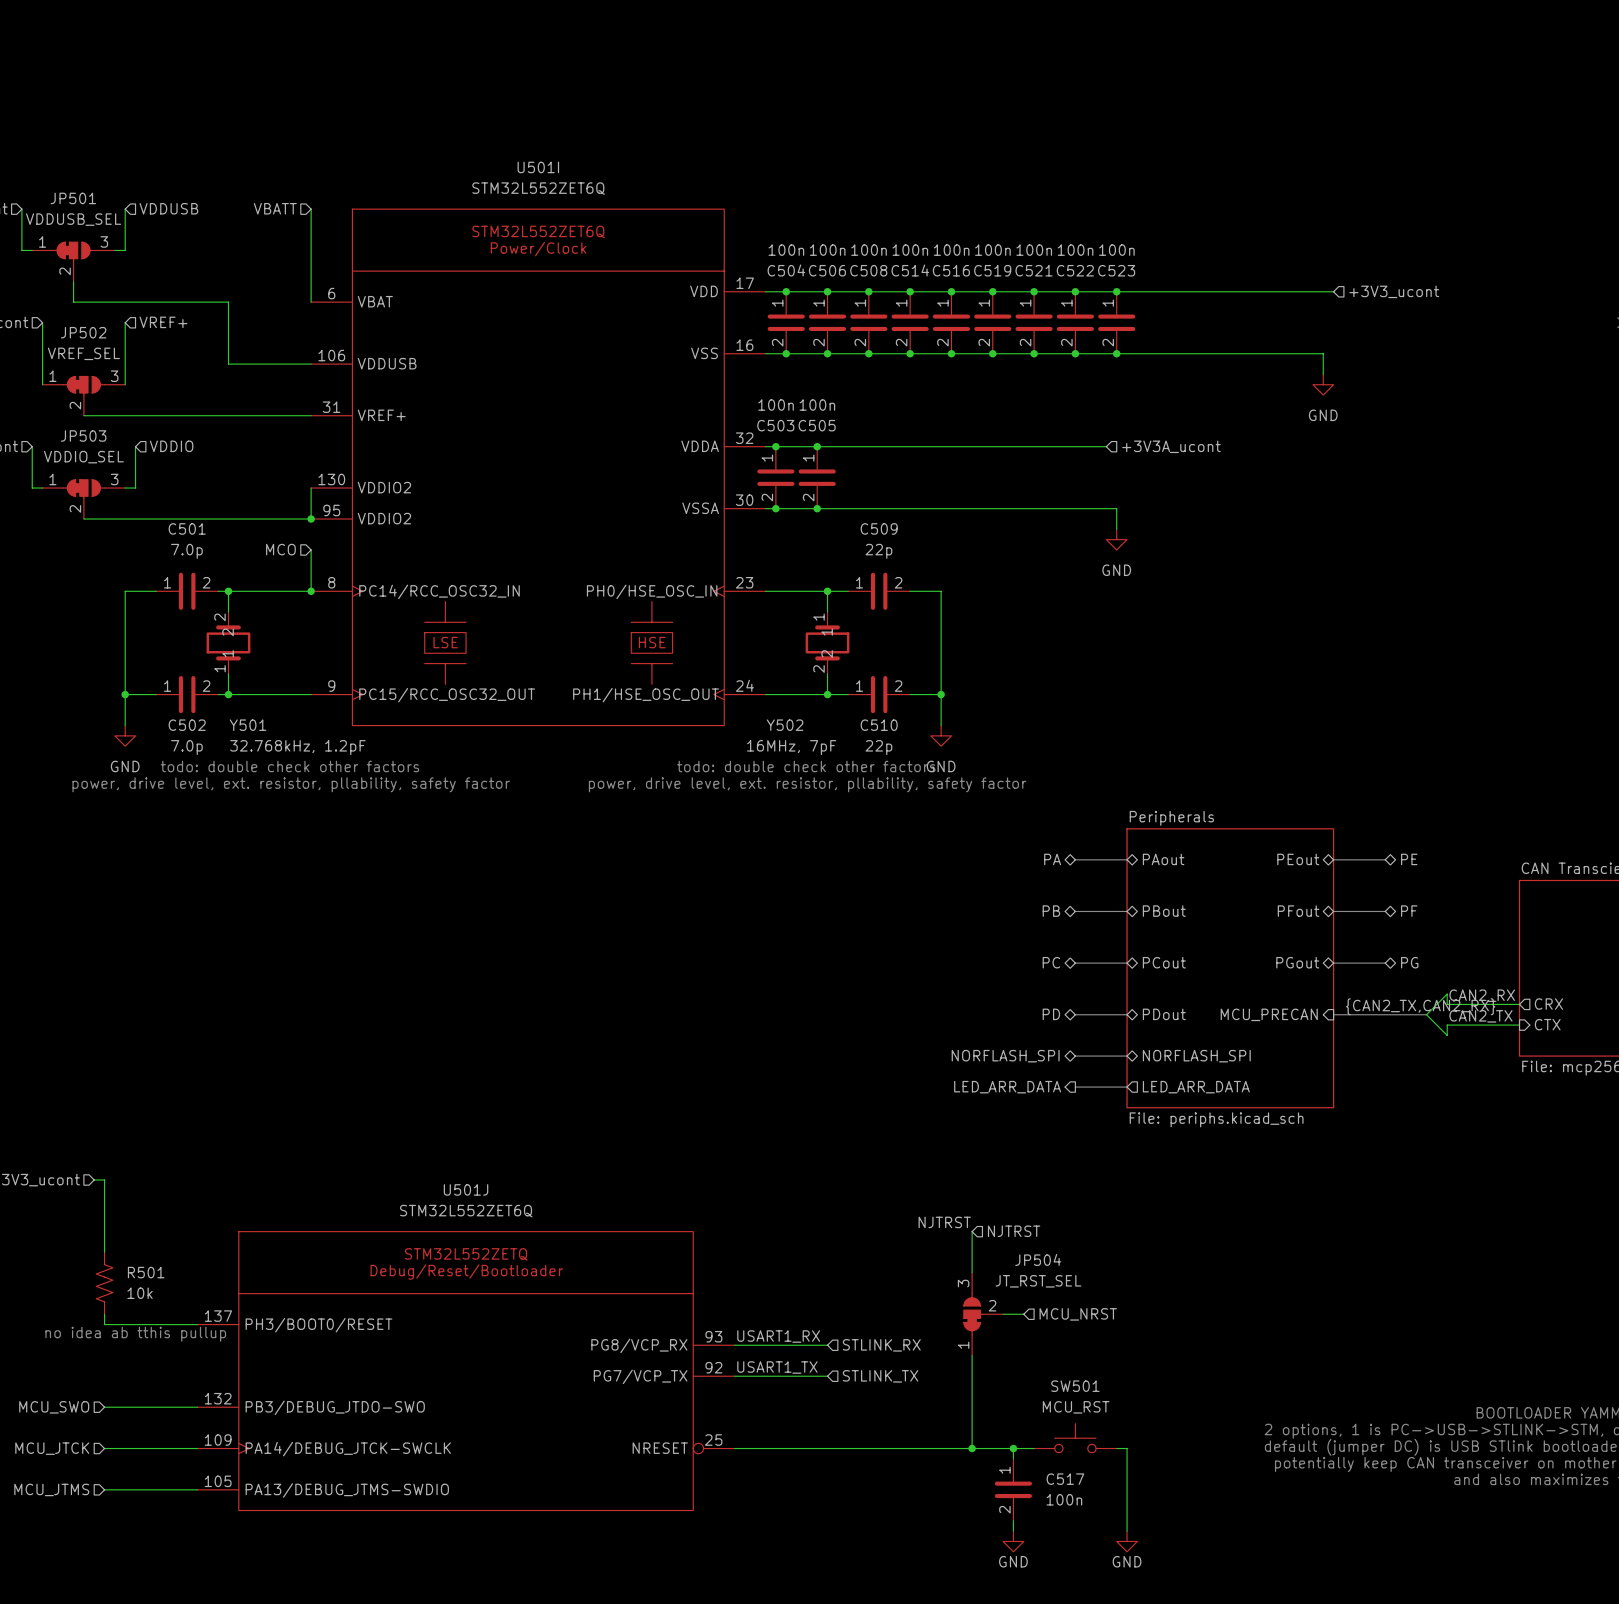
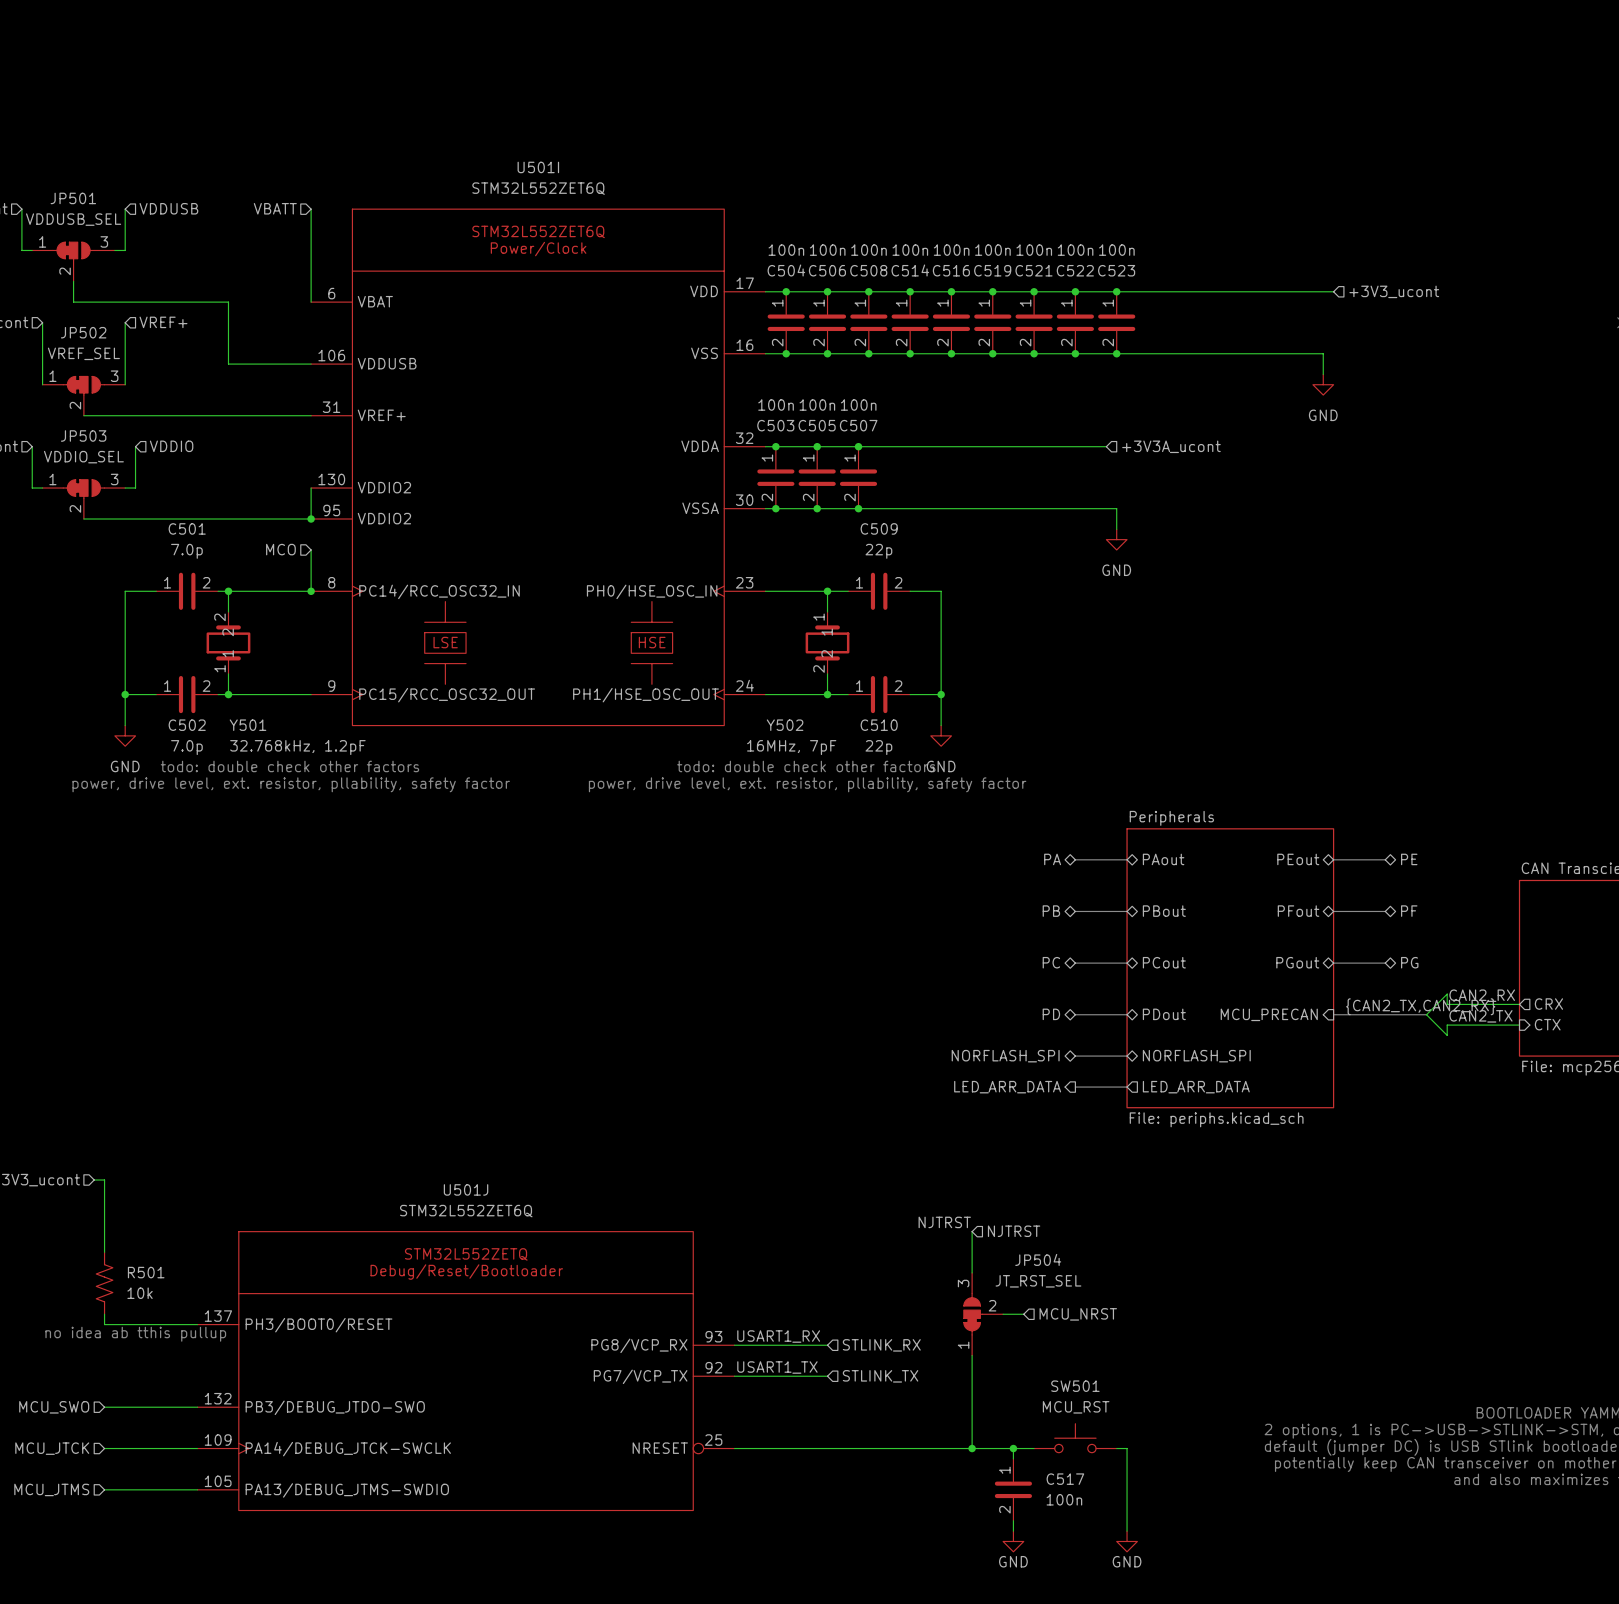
junction: none -> (858, 446)
C507: none -> 100n (858, 477)
junction: none -> (858, 508)

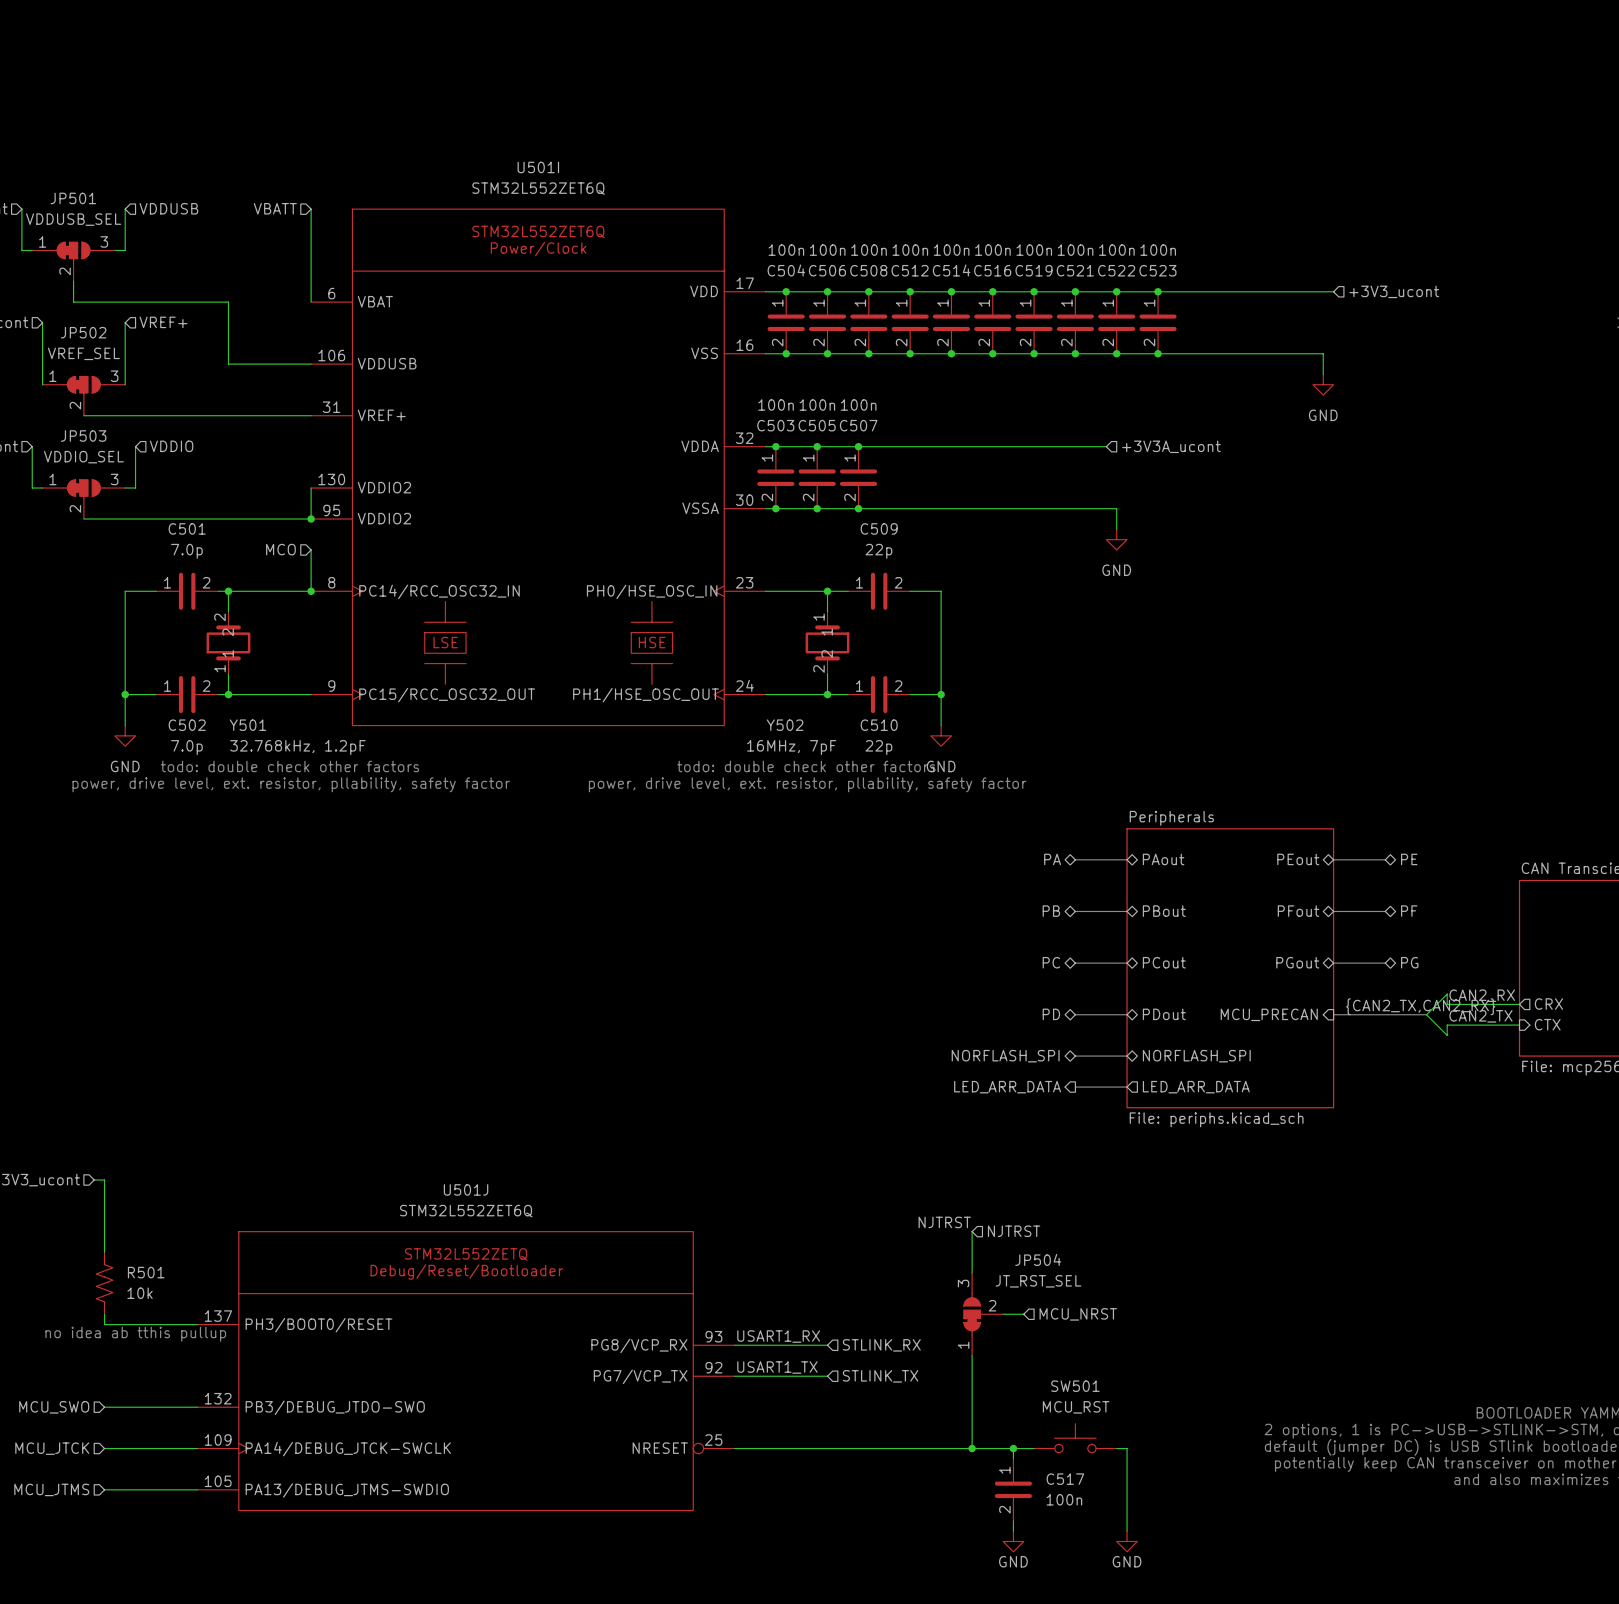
C514 name: C514 (910, 270) -> C512 (910, 270)
C516 name: C516 (951, 270) -> C514 (951, 270)
C519 name: C519 (992, 270) -> C516 (992, 270)
C521 name: C521 (1034, 270) -> C519 (1034, 270)
C522 name: C522 (1075, 270) -> C521 (1075, 270)
C523 name: C523 (1116, 270) -> C522 (1116, 270)
junction: none -> (1158, 291)
C523: none -> 100n (1158, 322)
junction: none -> (1158, 353)

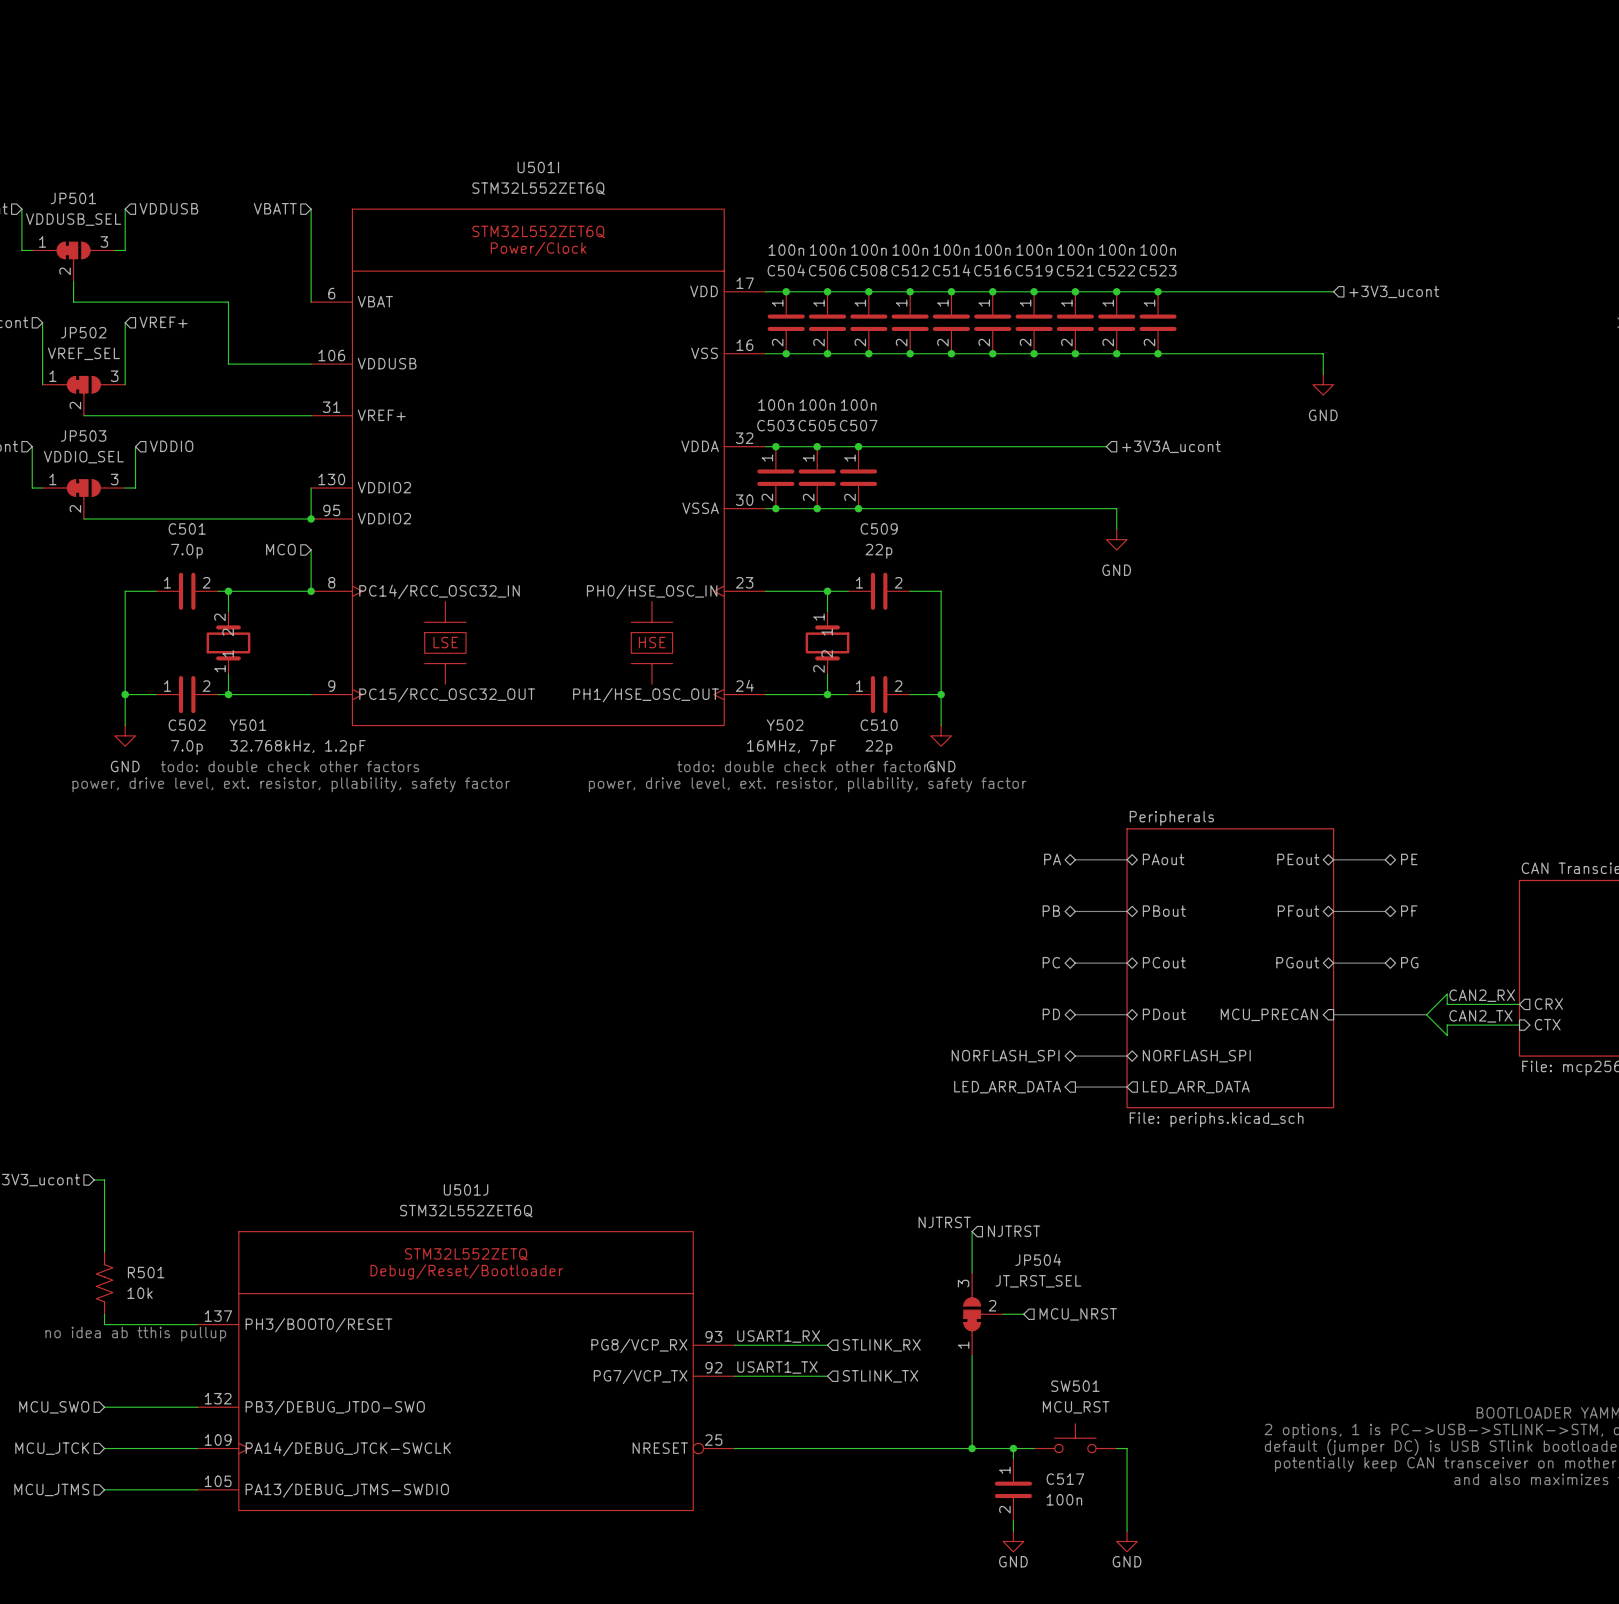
label: {CAN2_TX,CAN2_RX} (1420, 1006) -> none

